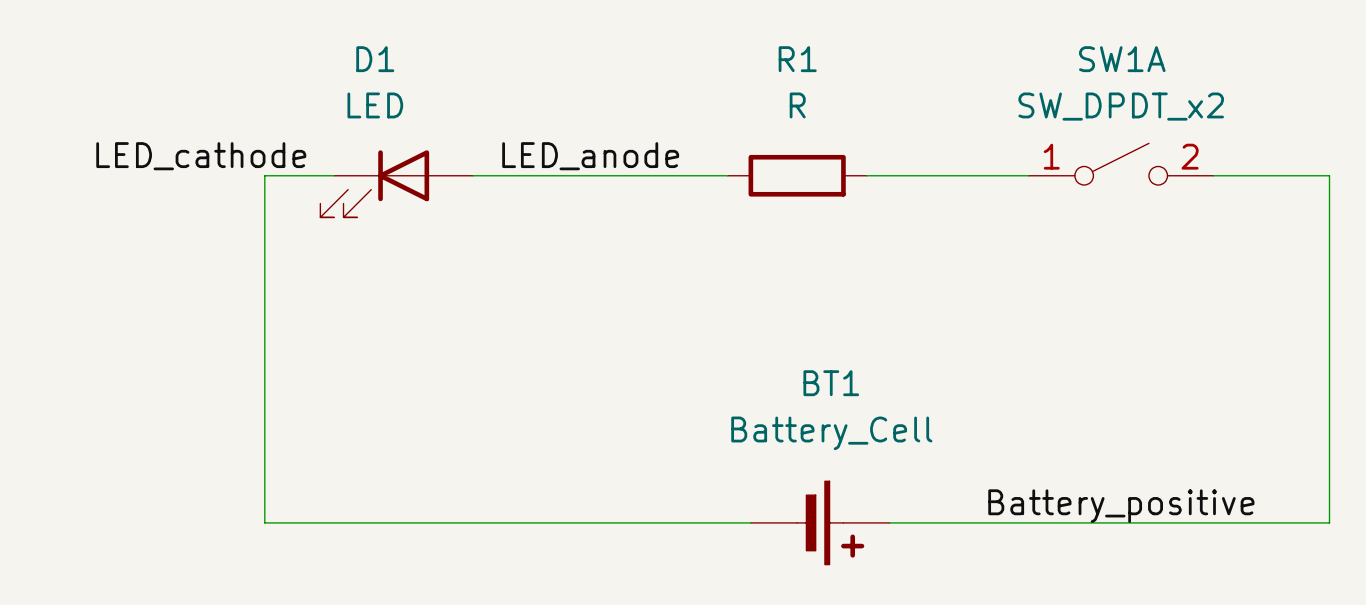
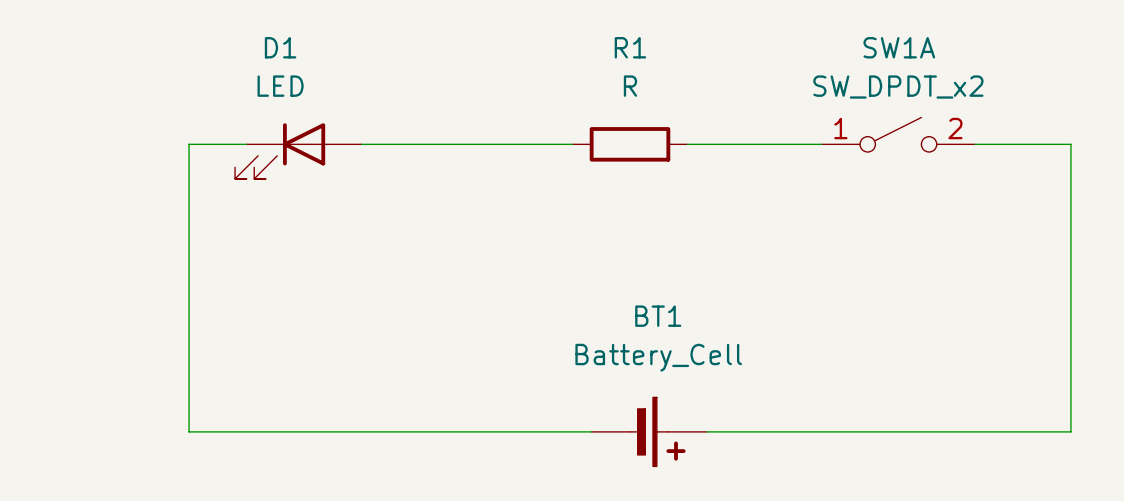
label: LED_cathode (201, 156) -> none
label: LED_anode (590, 156) -> none
label: Battery_positive (1121, 506) -> none

